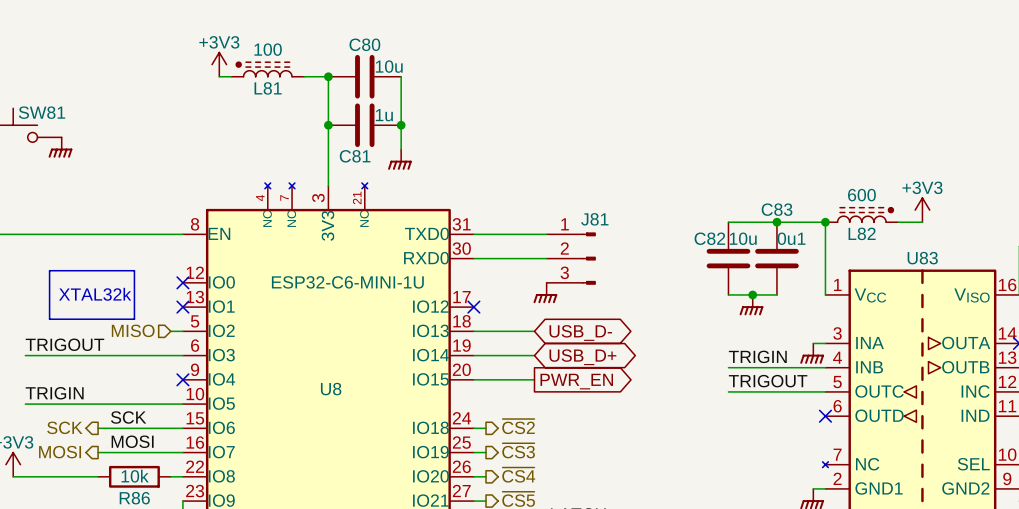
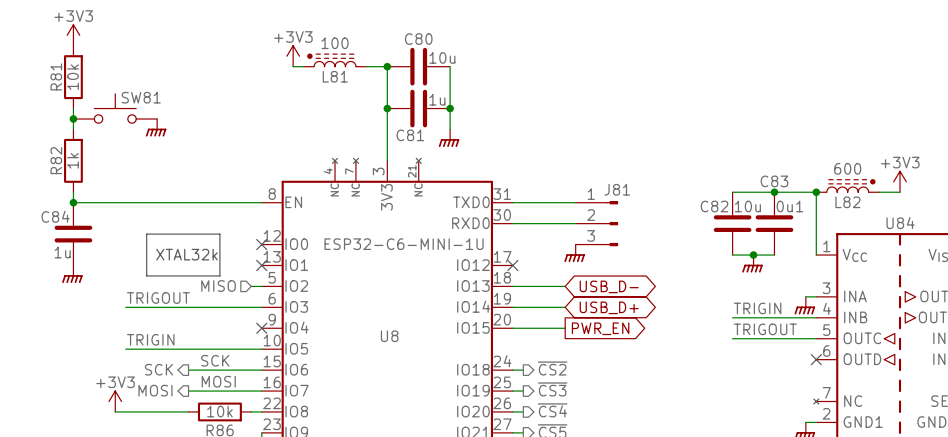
U83 name: U83 (922, 258) -> U84 (900, 222)

